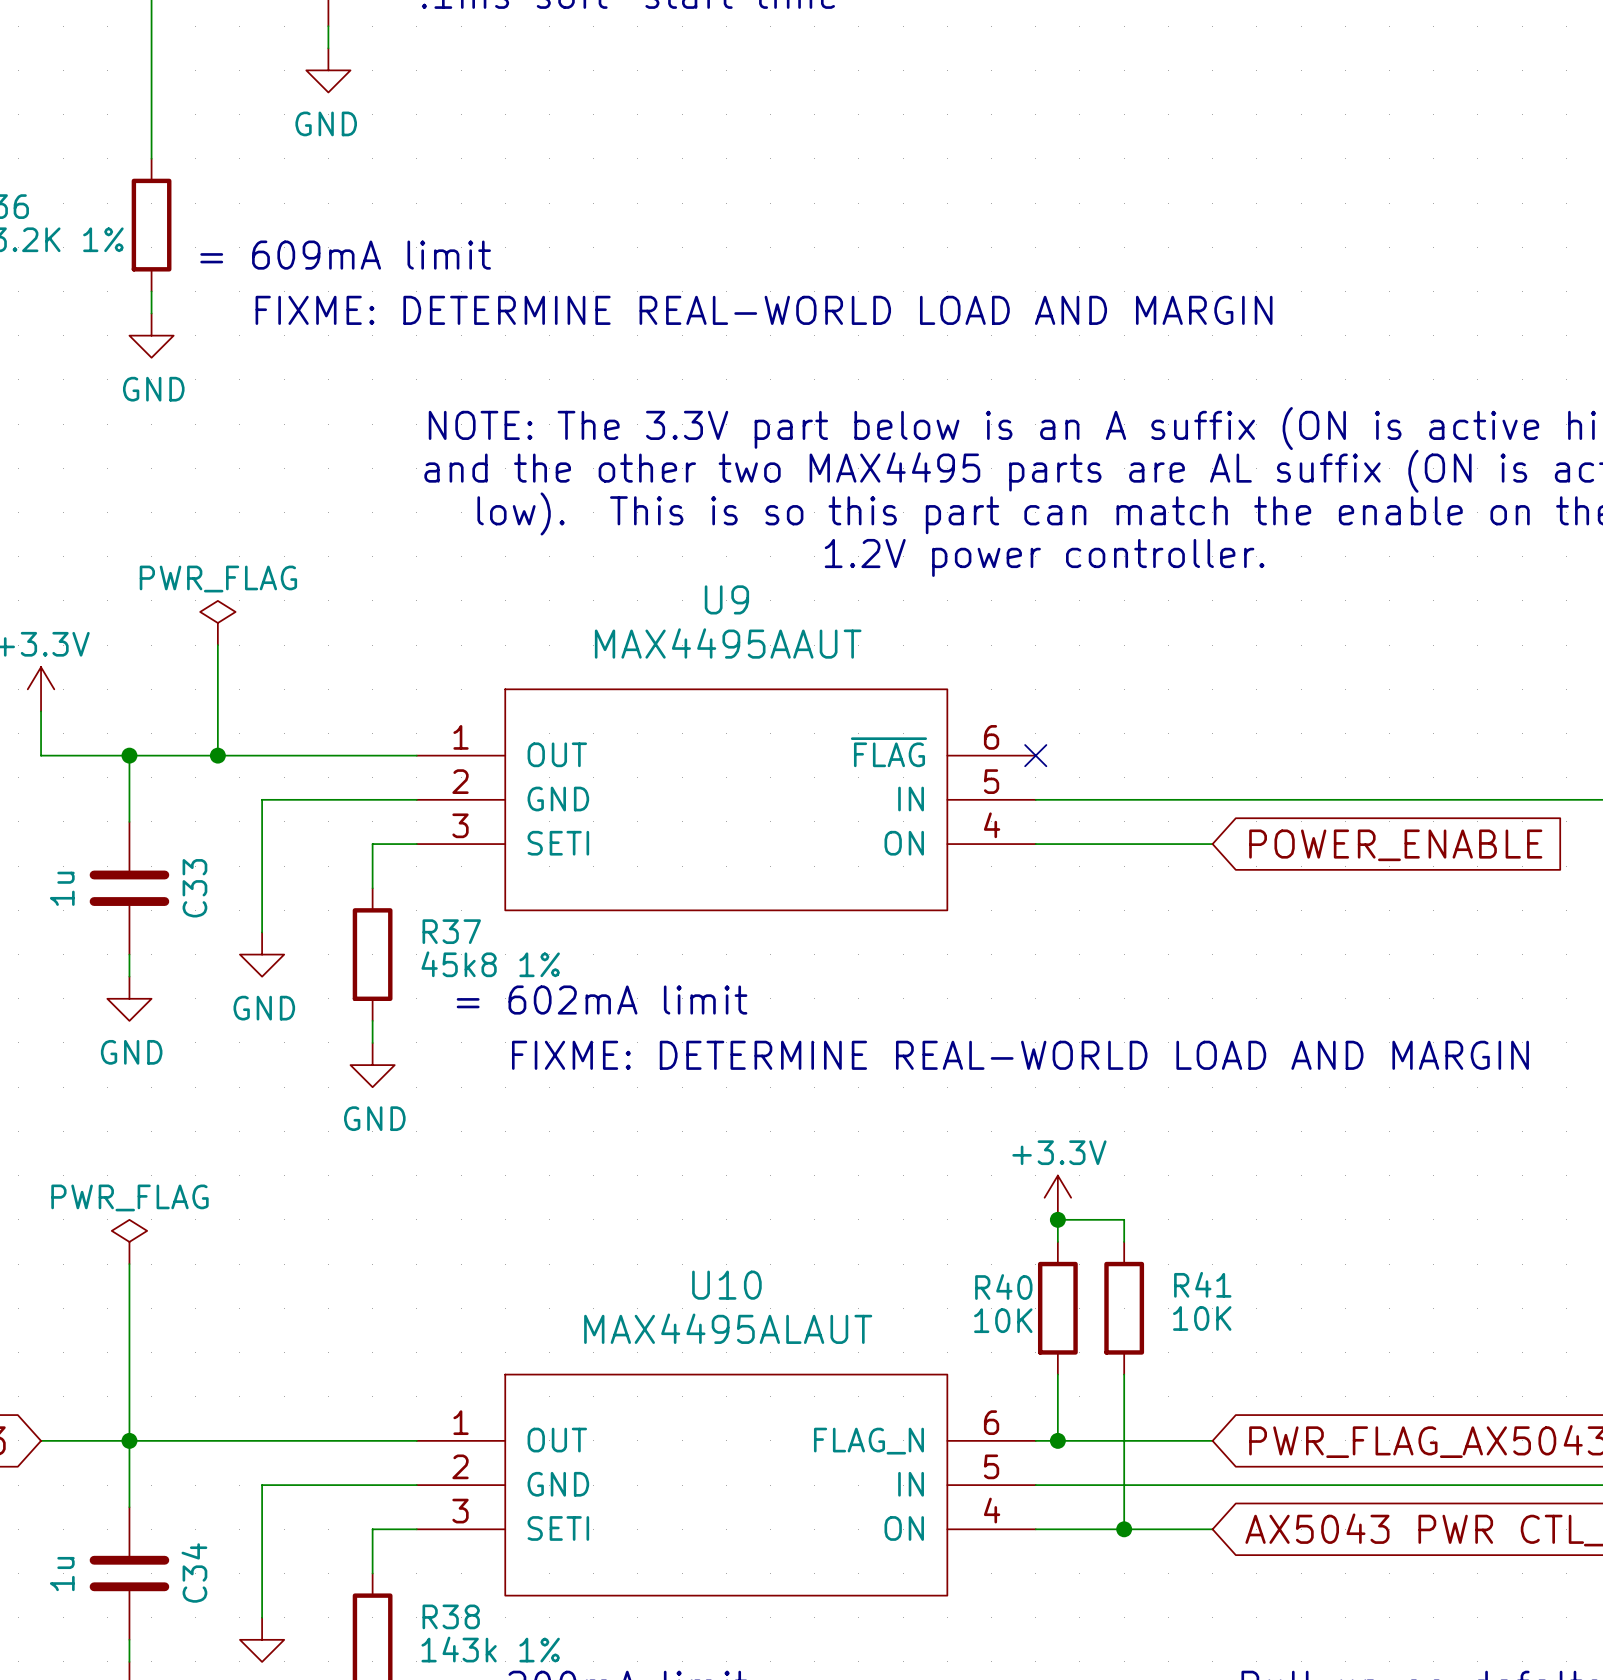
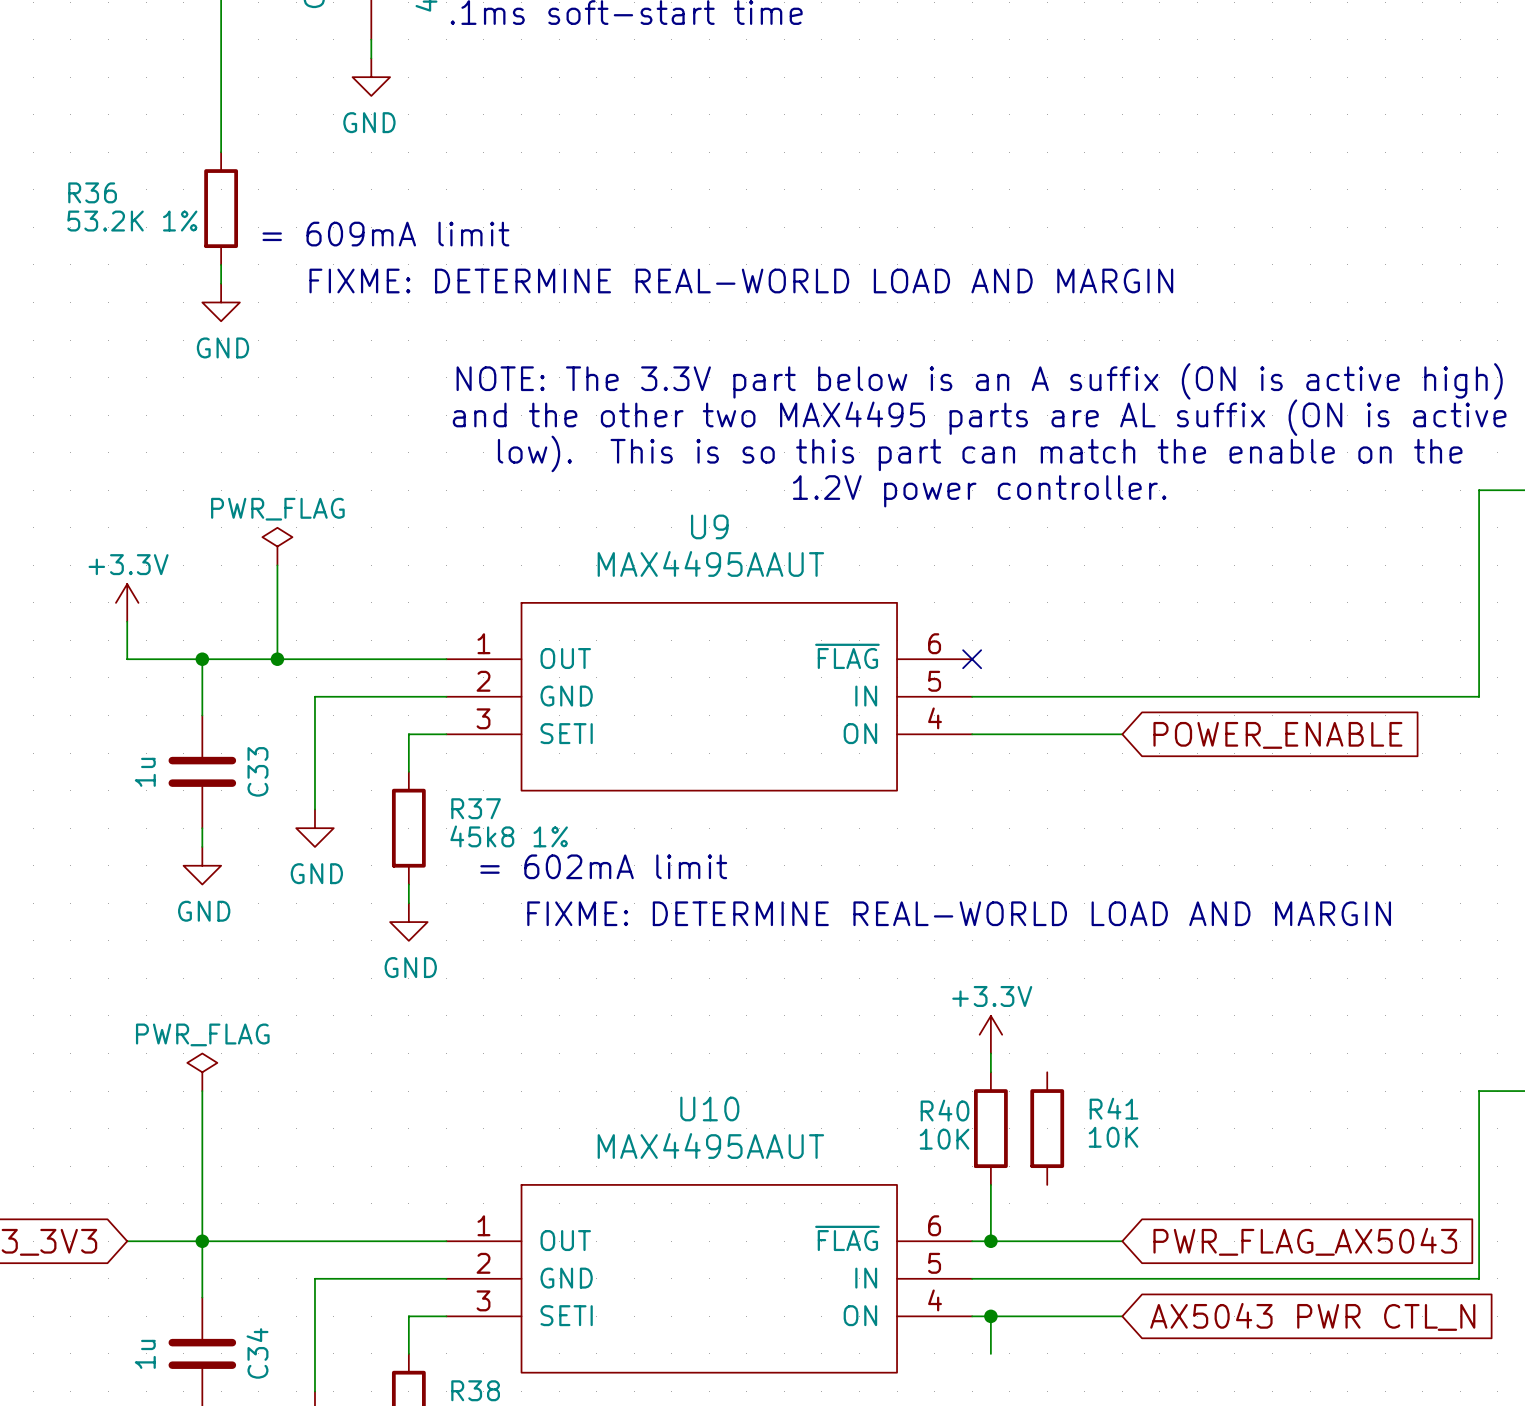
wire: (1057, 1219) (1124, 1219) (1124, 1241) -> none
junction: (1057, 1219) -> none
U10 value: MAX4495ALAUT (728, 1328) -> MAX4495AAUT (710, 1146)
wire: (1124, 1374) (1124, 1529) -> none
U10 pin name: FLAG_N (868, 1441) -> ~{FLAG} (847, 1238)
wire: none -> (990, 1316) (990, 1353)
junction position: (1124, 1529) -> (990, 1316)

